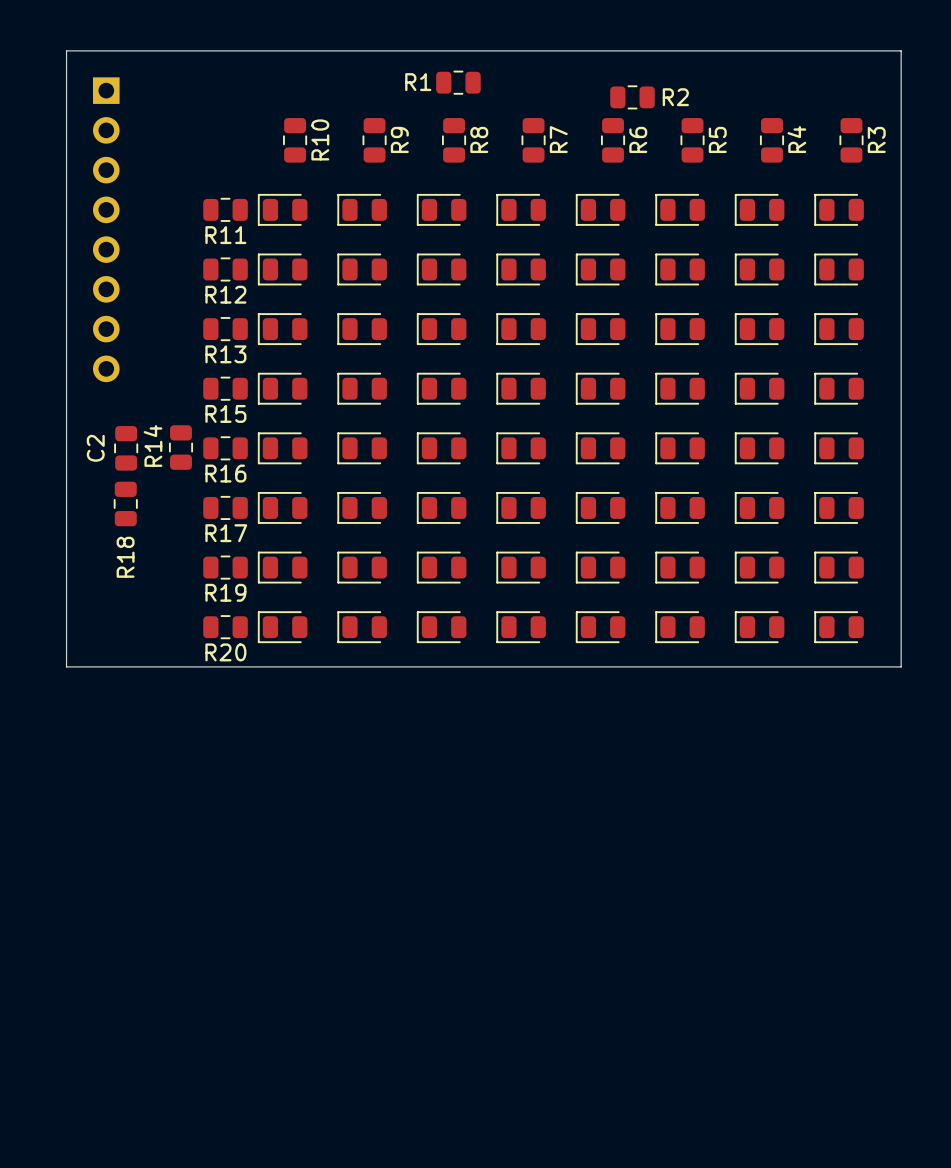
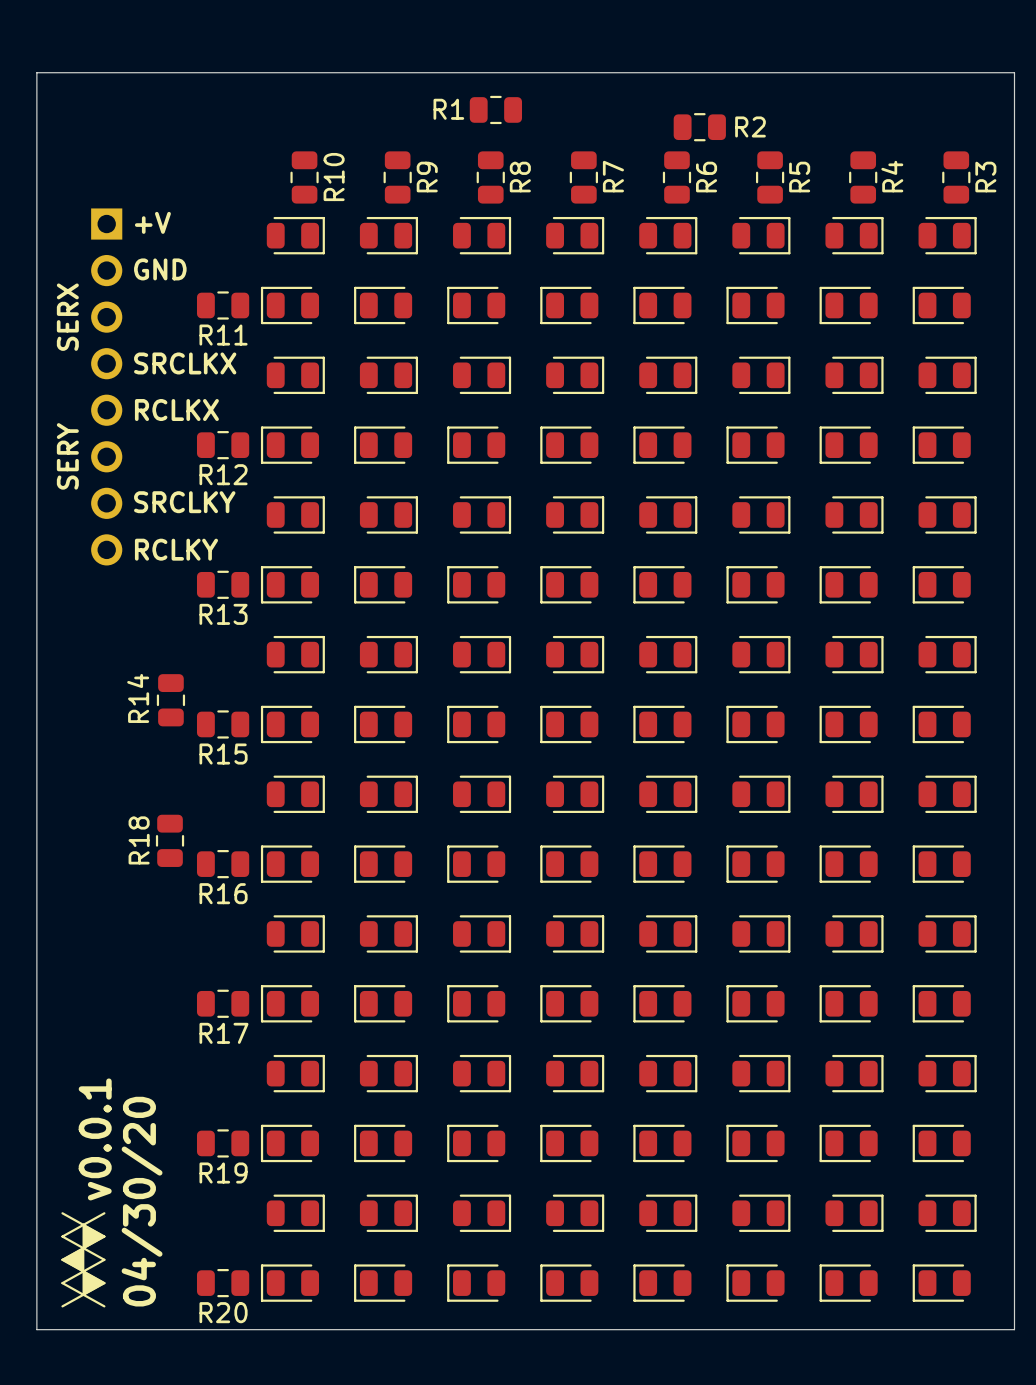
text: none -> +V (152, 222)
part: none -> (295, 235)
part: none -> (388, 235)
part: none -> (482, 235)
part: none -> (575, 235)
part: none -> (668, 235)
part: none -> (761, 235)
part: none -> (854, 235)
part: none -> (947, 235)
R11 position: (225, 209) -> (223, 305)
part: (282, 209) -> none
part: (362, 209) -> none
part: (441, 209) -> none
part: (521, 209) -> none
part: (600, 209) -> none
part: (680, 209) -> none
part: (759, 209) -> none
part: (839, 209) -> none
text: none -> GND (160, 269)
part position: (106, 229) -> (106, 386)
part: none -> (289, 305)
part: none -> (383, 305)
part: none -> (476, 305)
part: none -> (569, 305)
part: none -> (662, 305)
part: none -> (755, 305)
part: none -> (848, 305)
part: none -> (941, 305)
text: none -> SERX (67, 317)
R12 position: (225, 269) -> (223, 445)
part: (282, 269) -> none
part: (362, 269) -> none
part: (441, 269) -> none
part: (521, 269) -> none
part: (600, 269) -> none
part: (680, 269) -> none
part: (759, 269) -> none
part: (839, 269) -> none
text: none -> SRCLKX (185, 363)
part: none -> (295, 375)
part: none -> (388, 375)
part: none -> (482, 375)
part: none -> (575, 375)
part: none -> (668, 375)
part: none -> (761, 375)
part: none -> (854, 375)
part: none -> (947, 375)
R13 position: (225, 329) -> (223, 584)
part: (282, 329) -> none
part: (362, 329) -> none
part: (441, 329) -> none
part: (521, 329) -> none
part: (600, 329) -> none
part: (680, 329) -> none
part: (759, 329) -> none
part: (839, 329) -> none
text: none -> RCLKX (176, 410)
part: none -> (289, 445)
part: none -> (383, 445)
part: none -> (476, 445)
part: none -> (569, 445)
part: none -> (662, 445)
part: none -> (755, 445)
part: none -> (848, 445)
part: none -> (941, 445)
text: none -> SERY (67, 456)
R15 position: (225, 388) -> (223, 724)
part: (282, 388) -> none
part: (362, 388) -> none
part: (441, 388) -> none
part: (521, 388) -> none
part: (600, 388) -> none
part: (680, 388) -> none
part: (759, 388) -> none
part: (839, 388) -> none
text: none -> SRCLKY (184, 502)
part: none -> (295, 514)
part: none -> (388, 514)
part: none -> (482, 514)
part: none -> (575, 514)
part: none -> (668, 514)
part: none -> (761, 514)
part: none -> (854, 514)
part: none -> (947, 514)
R14 position: (181, 447) -> (170, 700)
C2: (126, 448) -> none
R16 position: (225, 448) -> (223, 864)
part: (282, 448) -> none
part: (362, 448) -> none
part: (441, 448) -> none
part: (521, 448) -> none
part: (600, 448) -> none
part: (680, 448) -> none
part: (759, 448) -> none
part: (839, 448) -> none
text: none -> RCLKY (176, 549)
part: none -> (289, 584)
part: none -> (383, 584)
part: none -> (476, 584)
part: none -> (569, 584)
part: none -> (662, 584)
part: none -> (755, 584)
part: none -> (848, 584)
part: none -> (941, 584)
R18 position: (125, 503) -> (170, 840)
R17 position: (225, 507) -> (223, 1003)
part: (282, 507) -> none
part: (362, 507) -> none
part: (441, 507) -> none
part: (521, 507) -> none
part: (600, 507) -> none
part: (680, 507) -> none
part: (759, 507) -> none
part: (839, 507) -> none
part: none -> (295, 654)
part: none -> (388, 654)
part: none -> (482, 654)
part: none -> (575, 654)
part: none -> (668, 654)
part: none -> (761, 654)
part: none -> (854, 654)
part: none -> (947, 654)
R18 name position: R18 (125, 557) -> R18 (139, 840)
R19 position: (225, 567) -> (223, 1143)
part: (282, 567) -> none
part: (362, 567) -> none
part: (441, 567) -> none
part: (521, 567) -> none
part: (600, 567) -> none
part: (680, 567) -> none
part: (759, 567) -> none
part: (839, 567) -> none
part: none -> (289, 724)
part: none -> (383, 724)
part: none -> (476, 724)
part: none -> (569, 724)
part: none -> (662, 724)
part: none -> (755, 724)
part: none -> (848, 724)
part: none -> (941, 724)
R20 position: (225, 627) -> (223, 1283)
part: (282, 627) -> none
part: (362, 627) -> none
part: (441, 627) -> none
part: (521, 627) -> none
part: (600, 627) -> none
part: (680, 627) -> none
part: (759, 627) -> none
part: (839, 627) -> none
board edge: (66, 666) (901, 666) -> (36, 794) (36, 1329) (1014, 1329) (1014, 794)
part: none -> (295, 794)
part: none -> (388, 794)
part: none -> (482, 794)
part: none -> (575, 794)
part: none -> (668, 794)
part: none -> (761, 794)
part: none -> (854, 794)
part: none -> (947, 794)
part: none -> (289, 864)
part: none -> (383, 864)
part: none -> (476, 864)
part: none -> (569, 864)
part: none -> (662, 864)
part: none -> (755, 864)
part: none -> (848, 864)
part: none -> (941, 864)
part: none -> (295, 933)
part: none -> (388, 933)
part: none -> (482, 933)
part: none -> (575, 933)
part: none -> (668, 933)
part: none -> (761, 933)
part: none -> (854, 933)
part: none -> (947, 933)
part: none -> (289, 1003)
part: none -> (383, 1003)
part: none -> (476, 1003)
part: none -> (569, 1003)
part: none -> (662, 1003)
part: none -> (755, 1003)
part: none -> (848, 1003)
part: none -> (941, 1003)
part: none -> (295, 1073)
part: none -> (388, 1073)
part: none -> (482, 1073)
part: none -> (575, 1073)
part: none -> (668, 1073)
part: none -> (761, 1073)
part: none -> (854, 1073)
part: none -> (947, 1073)
text: none -> v0.0.1 (95, 1139)
part: none -> (289, 1143)
part: none -> (383, 1143)
part: none -> (476, 1143)
part: none -> (569, 1143)
part: none -> (662, 1143)
part: none -> (755, 1143)
part: none -> (848, 1143)
part: none -> (941, 1143)
text: none -> 04/30/20 (142, 1201)
drawing: none -> [61, 1212, 106, 1308]
part: none -> (295, 1213)
part: none -> (388, 1213)
part: none -> (482, 1213)
part: none -> (575, 1213)
part: none -> (668, 1213)
part: none -> (761, 1213)
part: none -> (854, 1213)
part: none -> (947, 1213)
part: none -> (289, 1283)
part: none -> (383, 1283)
part: none -> (476, 1283)
part: none -> (569, 1283)
part: none -> (662, 1283)
part: none -> (755, 1283)
part: none -> (848, 1283)
part: none -> (941, 1283)

